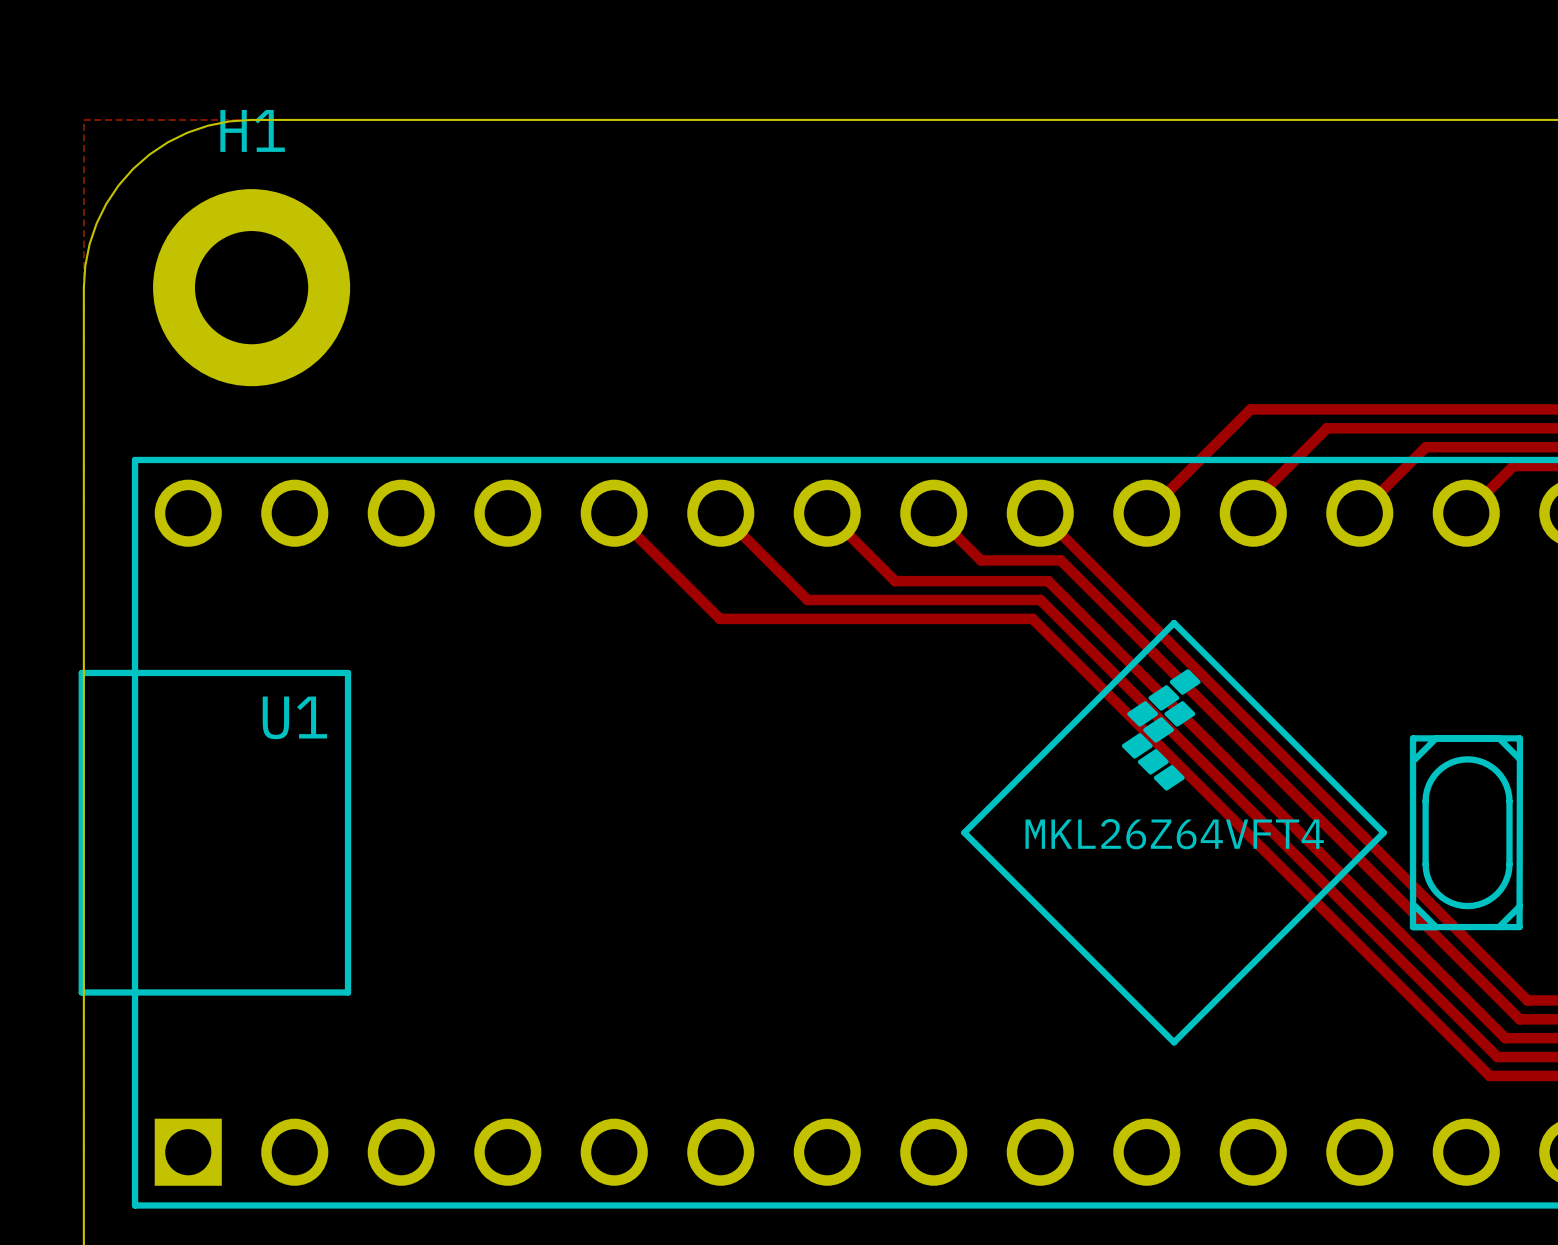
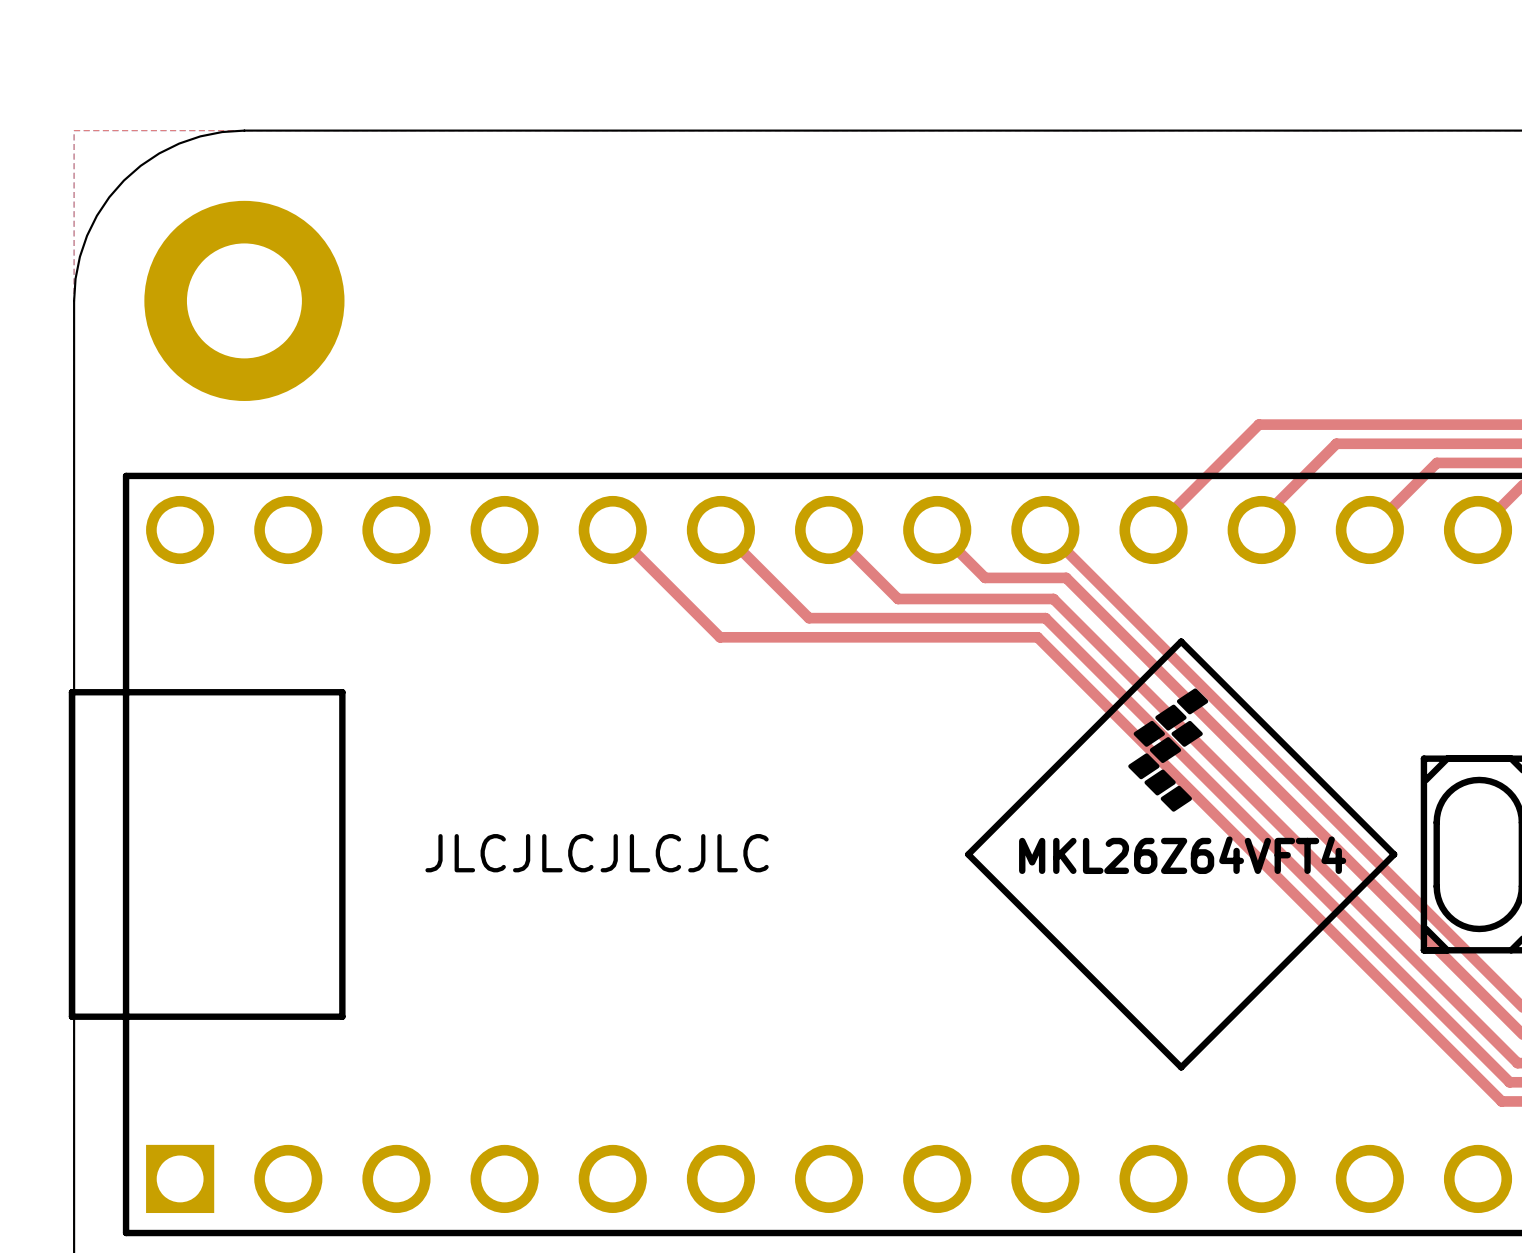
H1 name: H1 (252, 130) -> none
U1 name: U1 (294, 717) -> none
text: none -> JLCJLCJLCJLC (597, 853)

